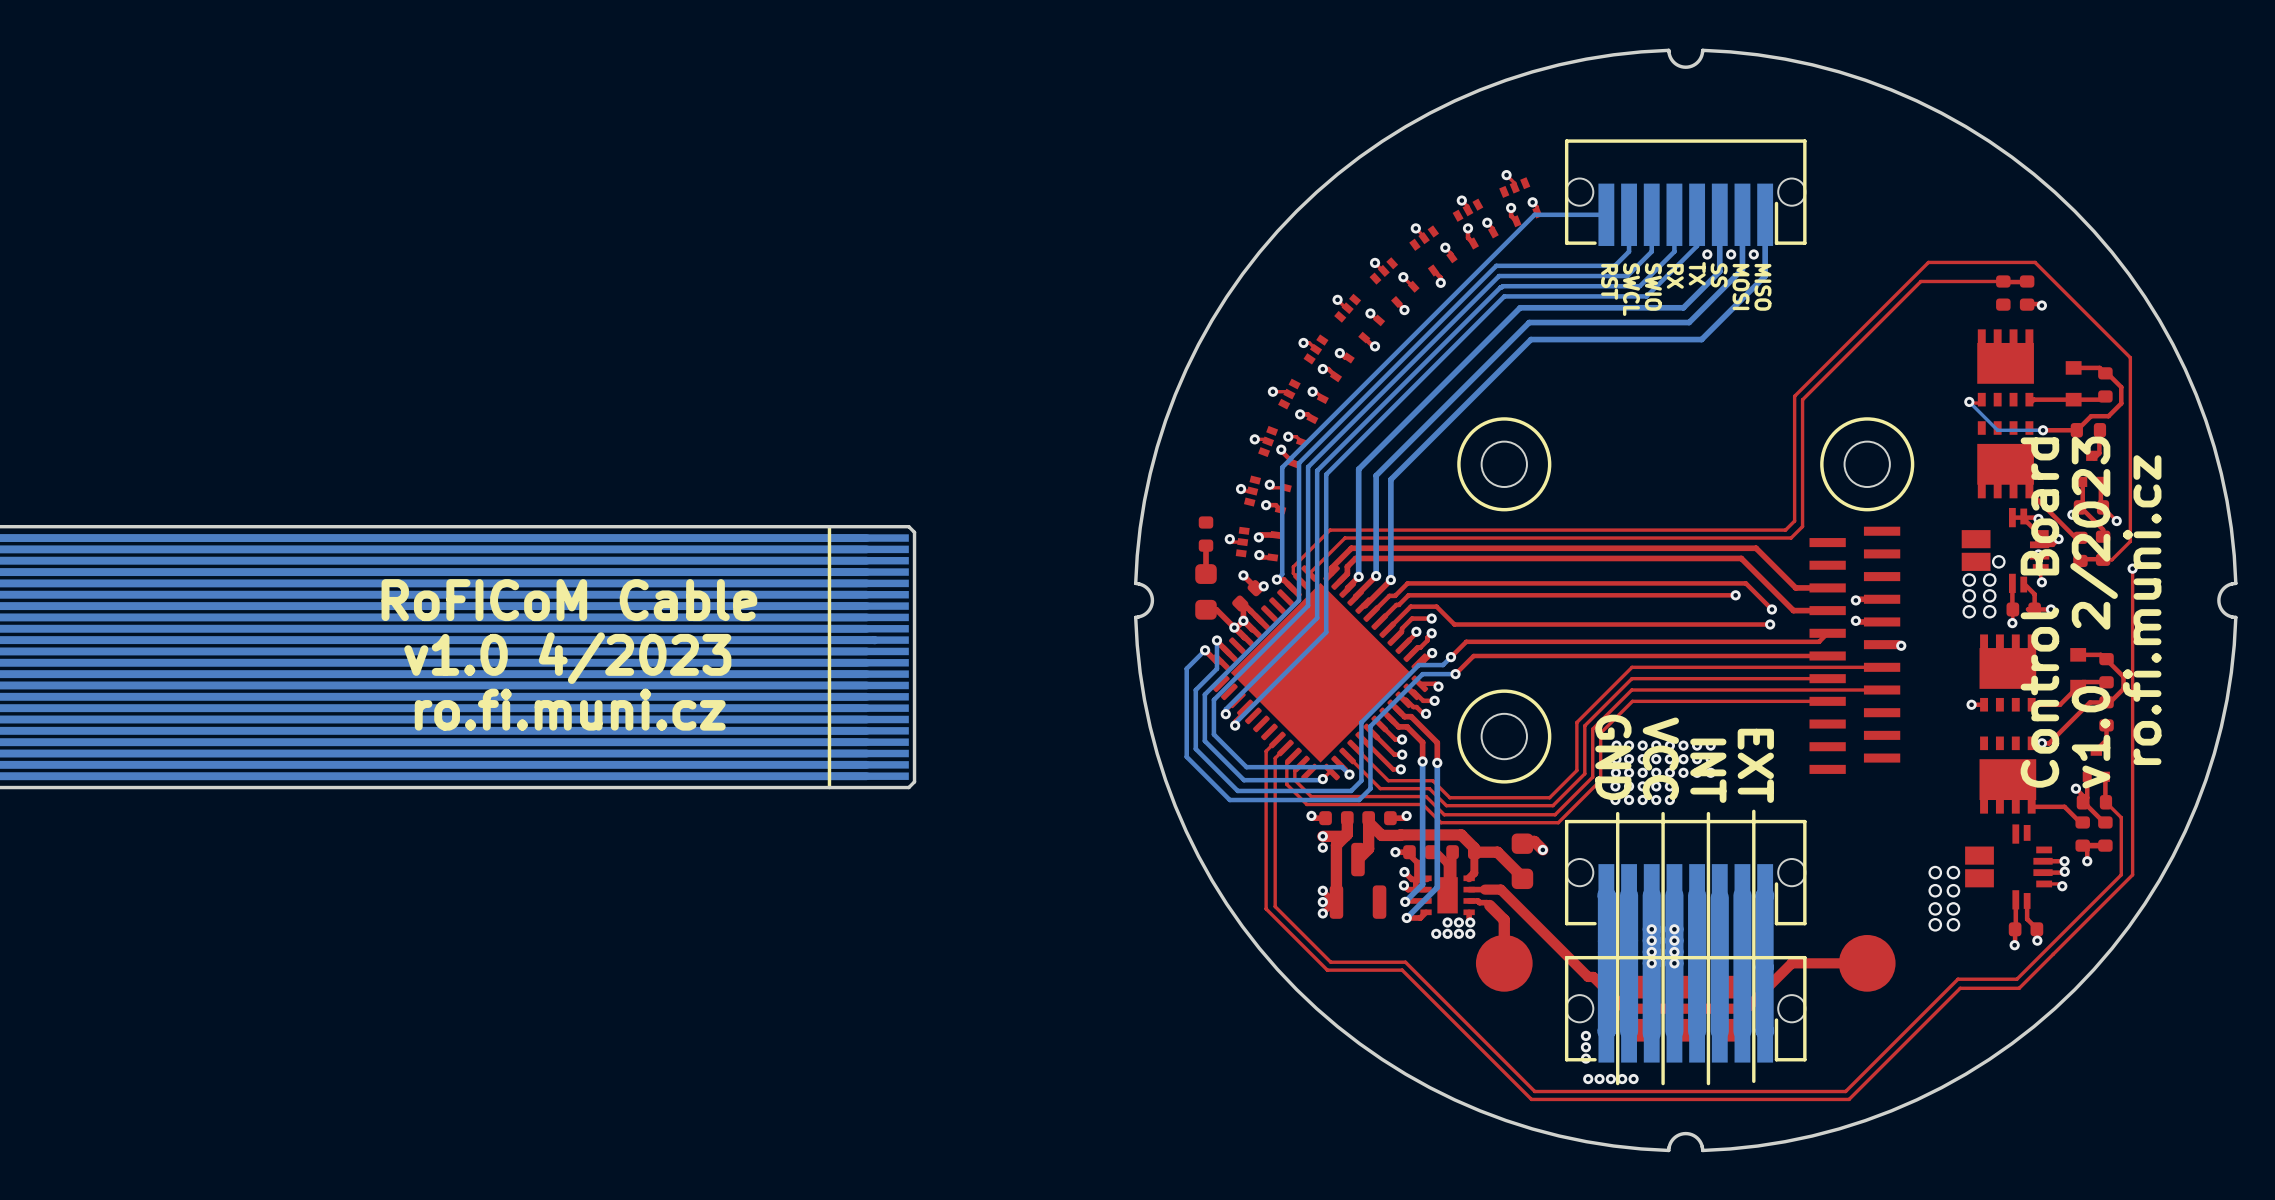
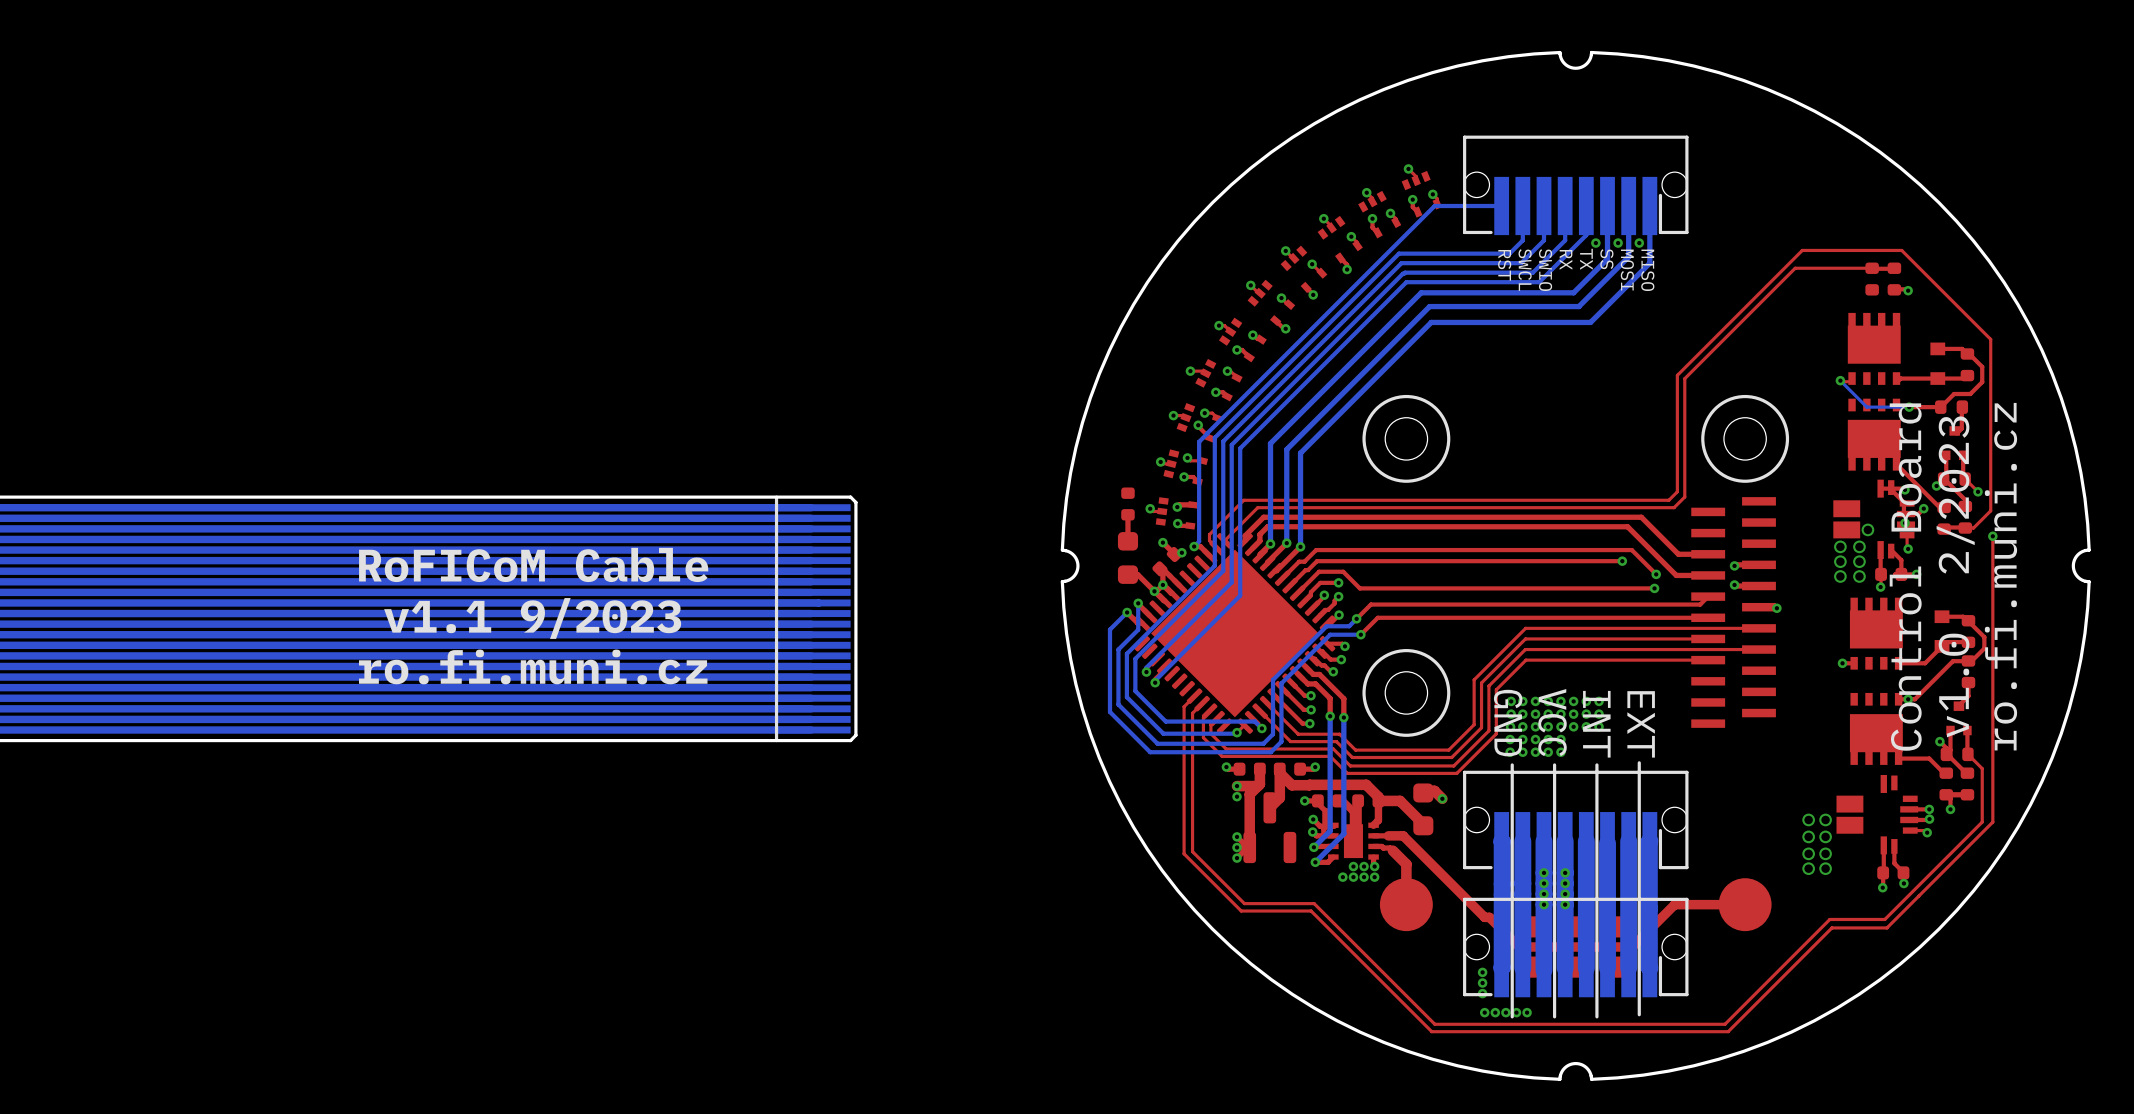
text: v1.0 4/2023 (567, 658) -> v1.1 9/2023 (532, 618)

